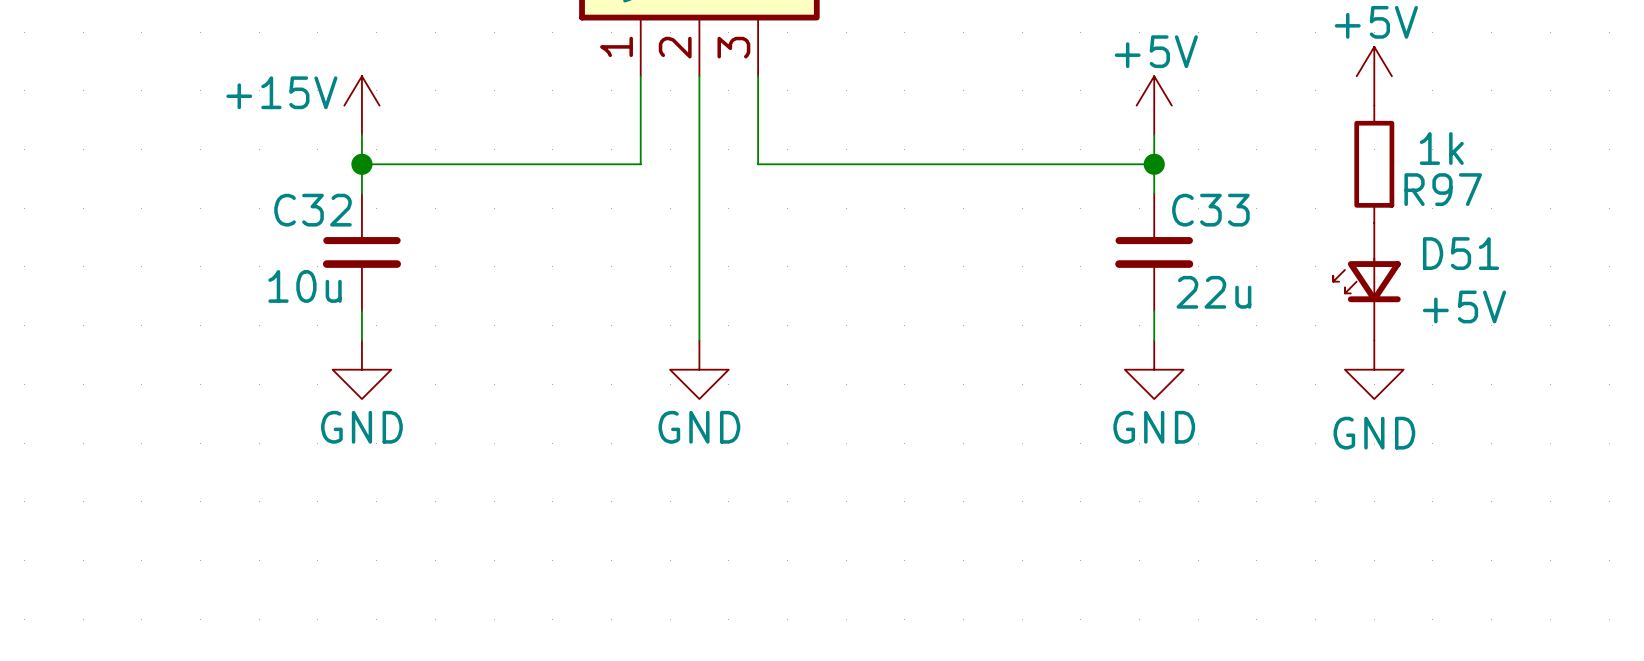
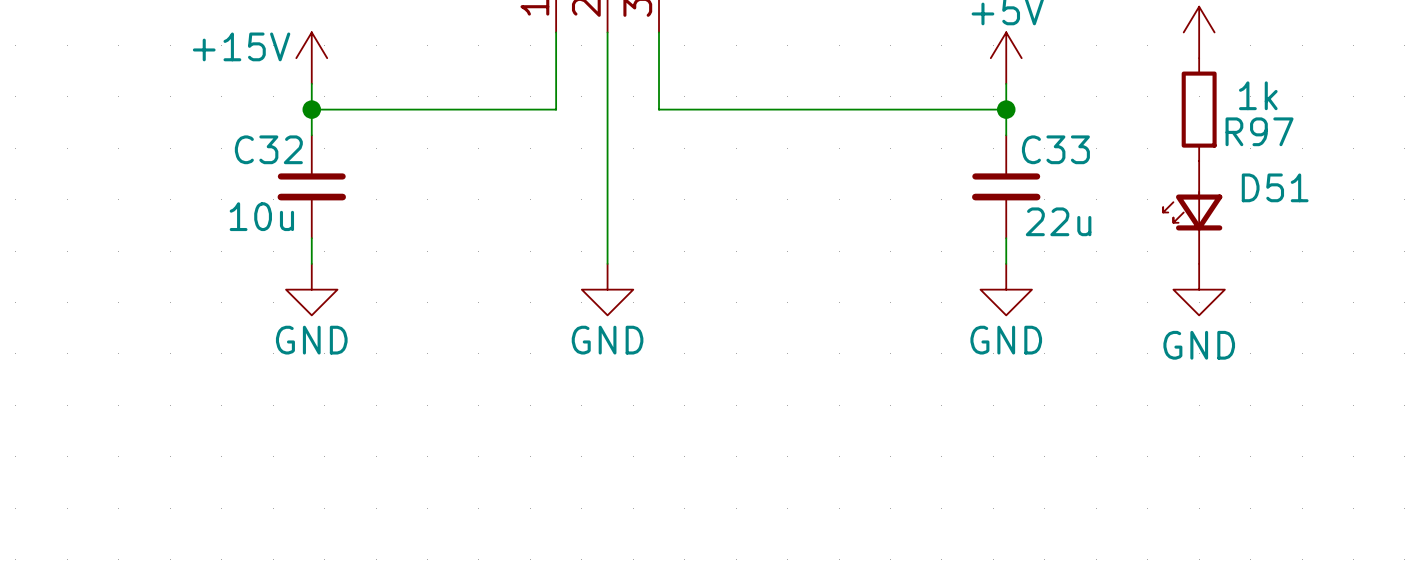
D51 value: +5V (1464, 306) -> none

